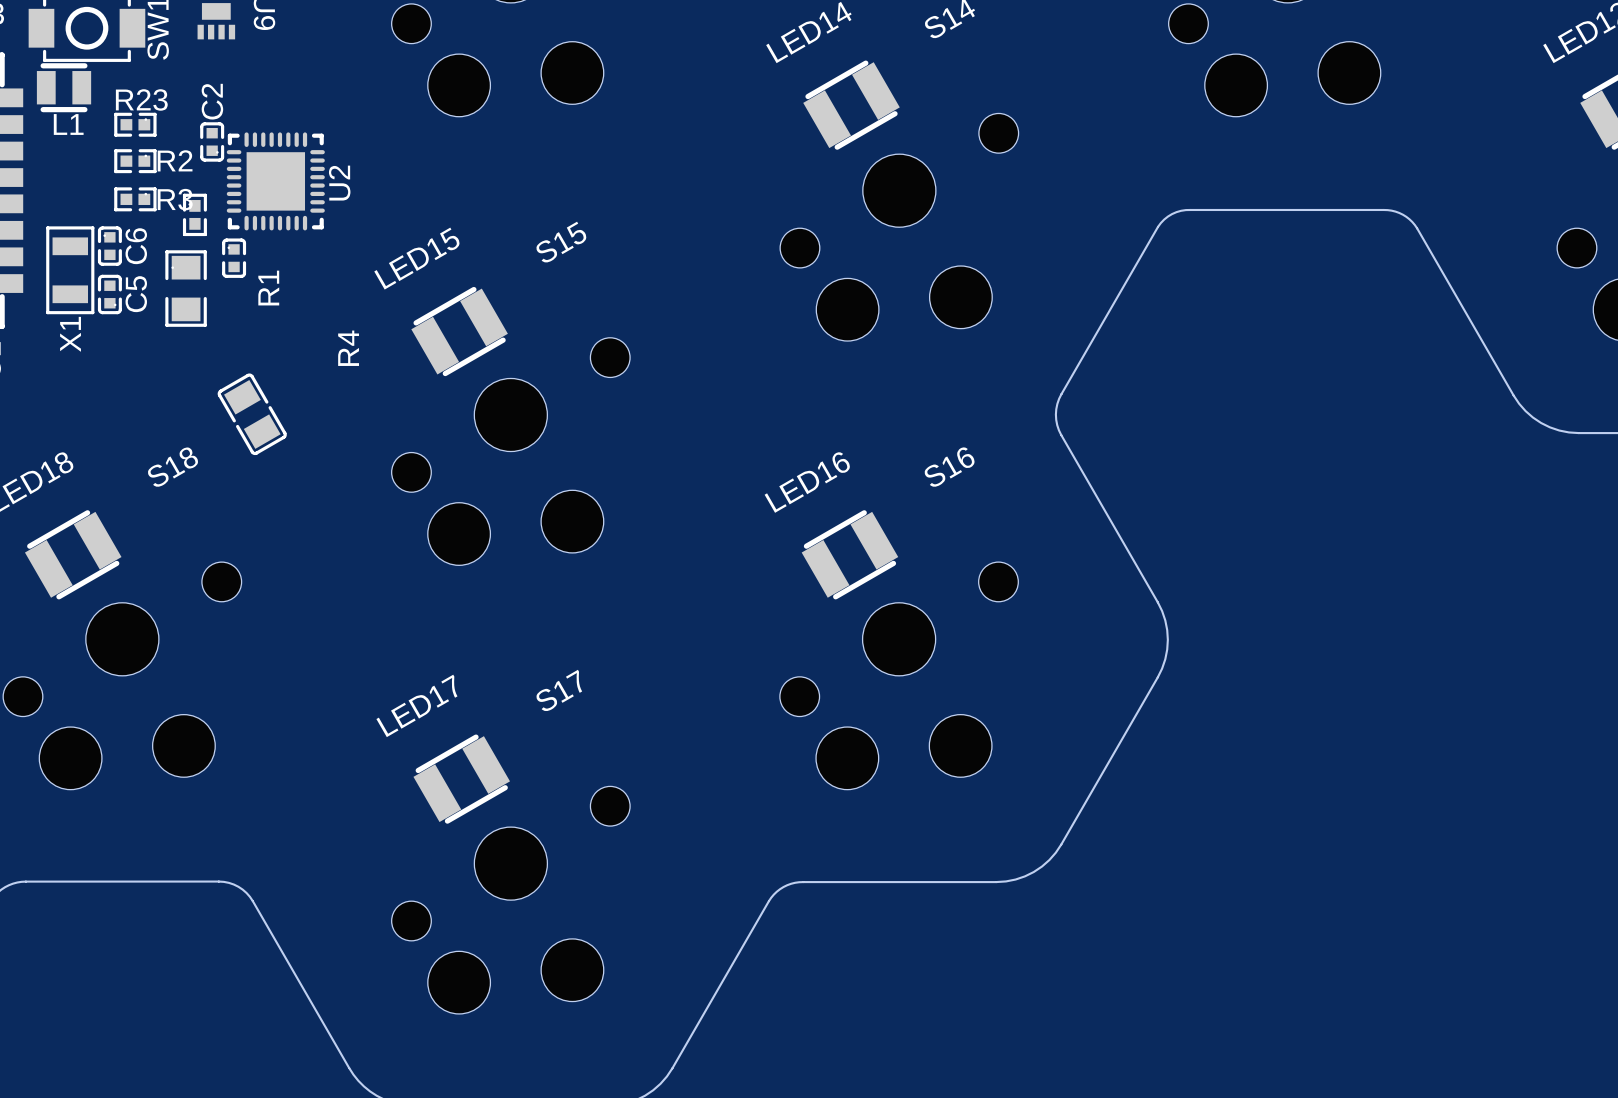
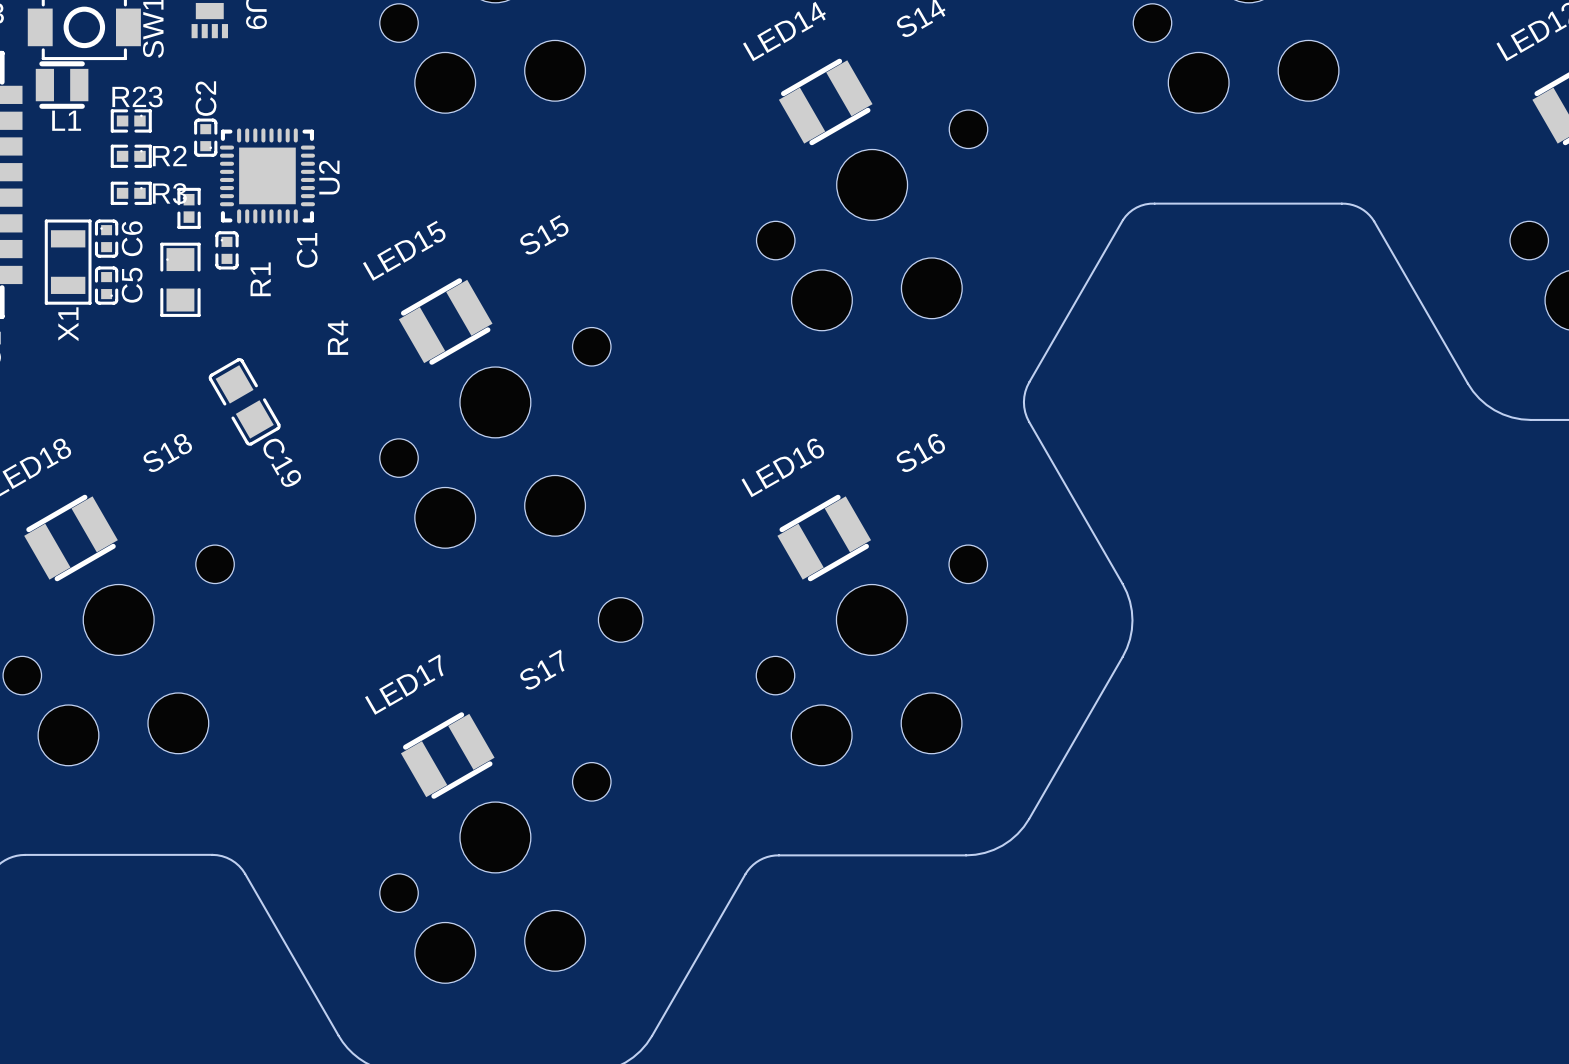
C1 name: none -> C1 (307, 250)
part: (252, 414) -> none
C19: none -> (244, 401)
part: none -> (620, 619)

